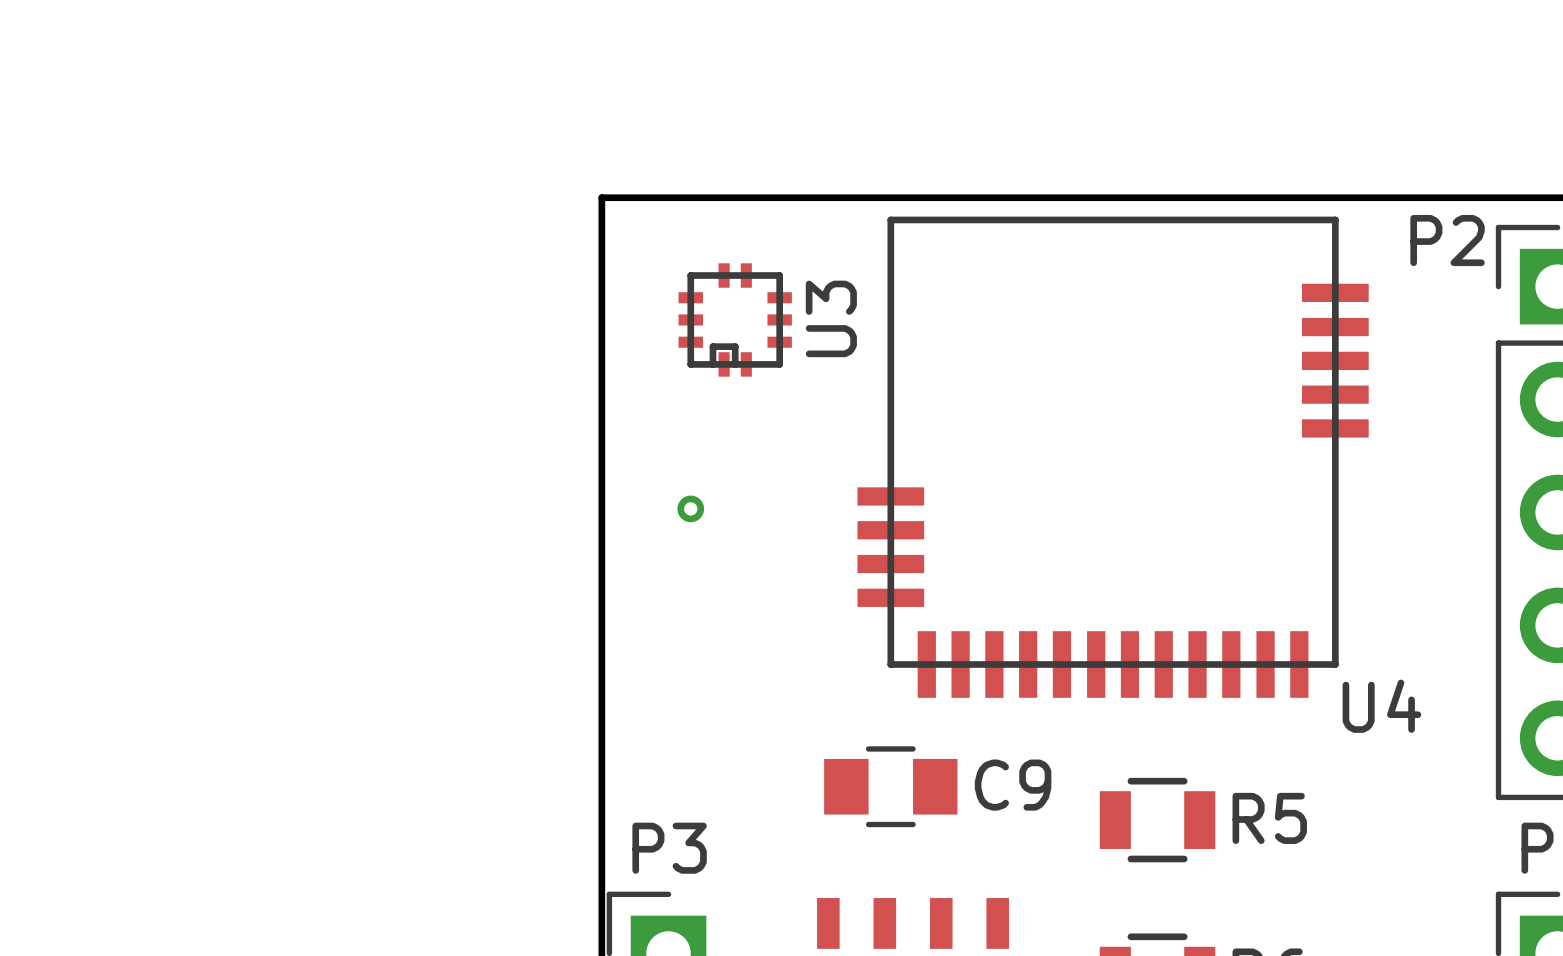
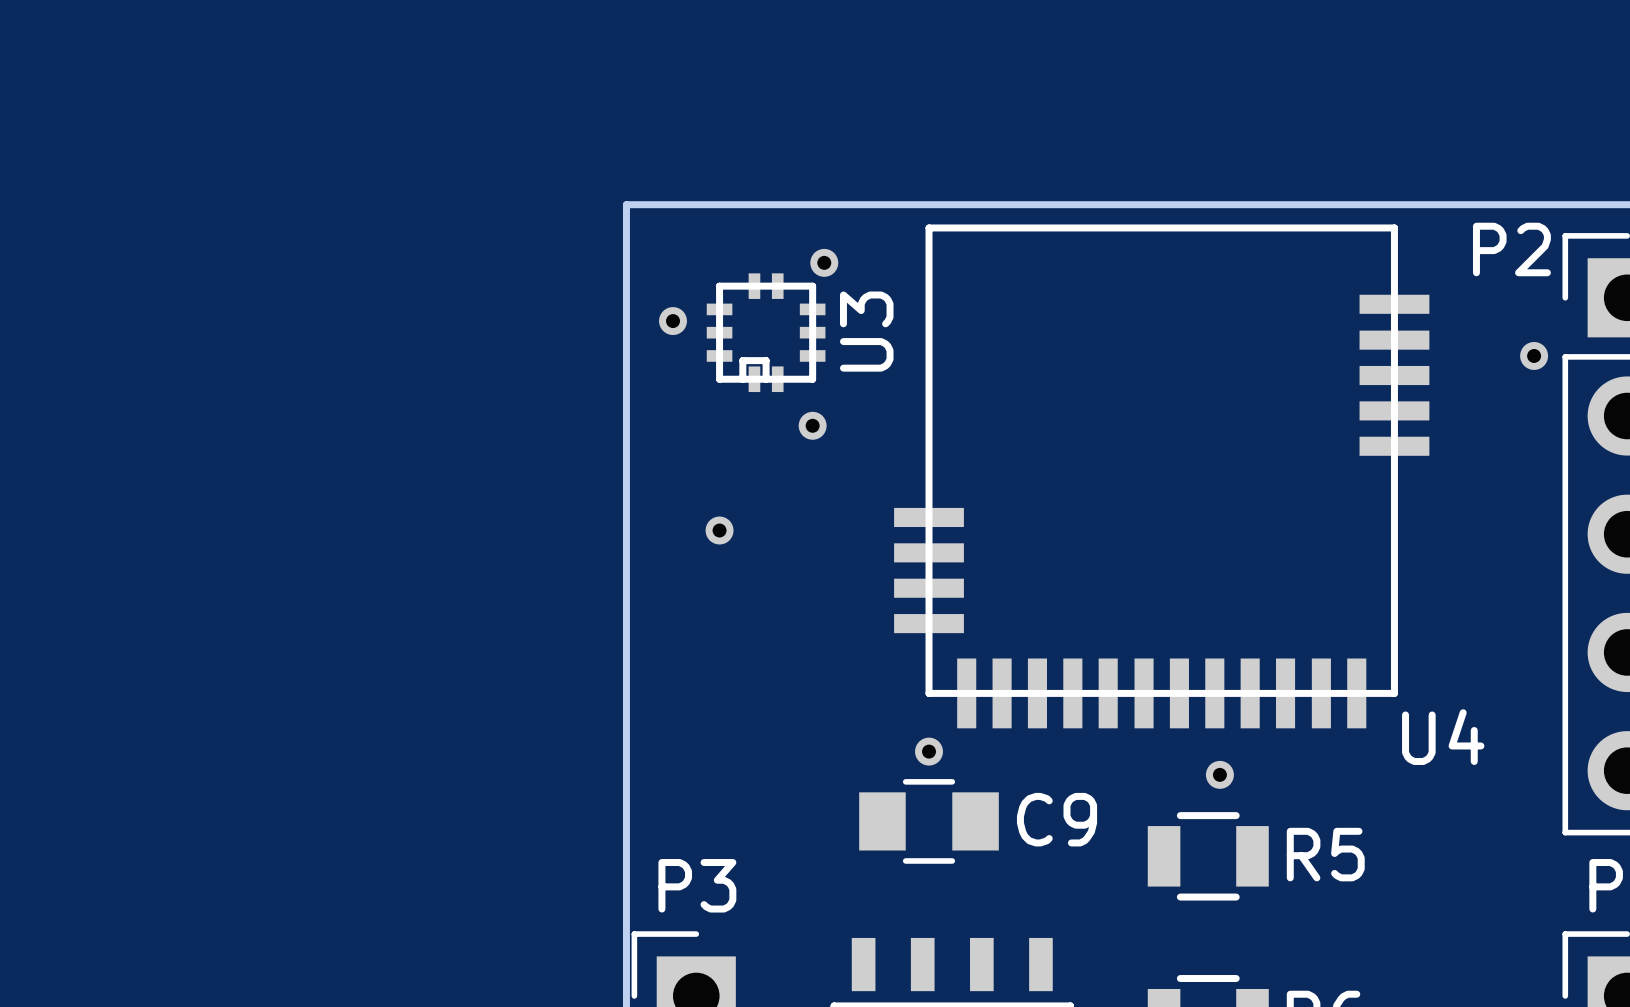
part: none -> (824, 262)
part: none -> (673, 321)
part: none -> (1534, 355)
part: none -> (812, 425)
part: none -> (929, 751)
part: none -> (1219, 774)

